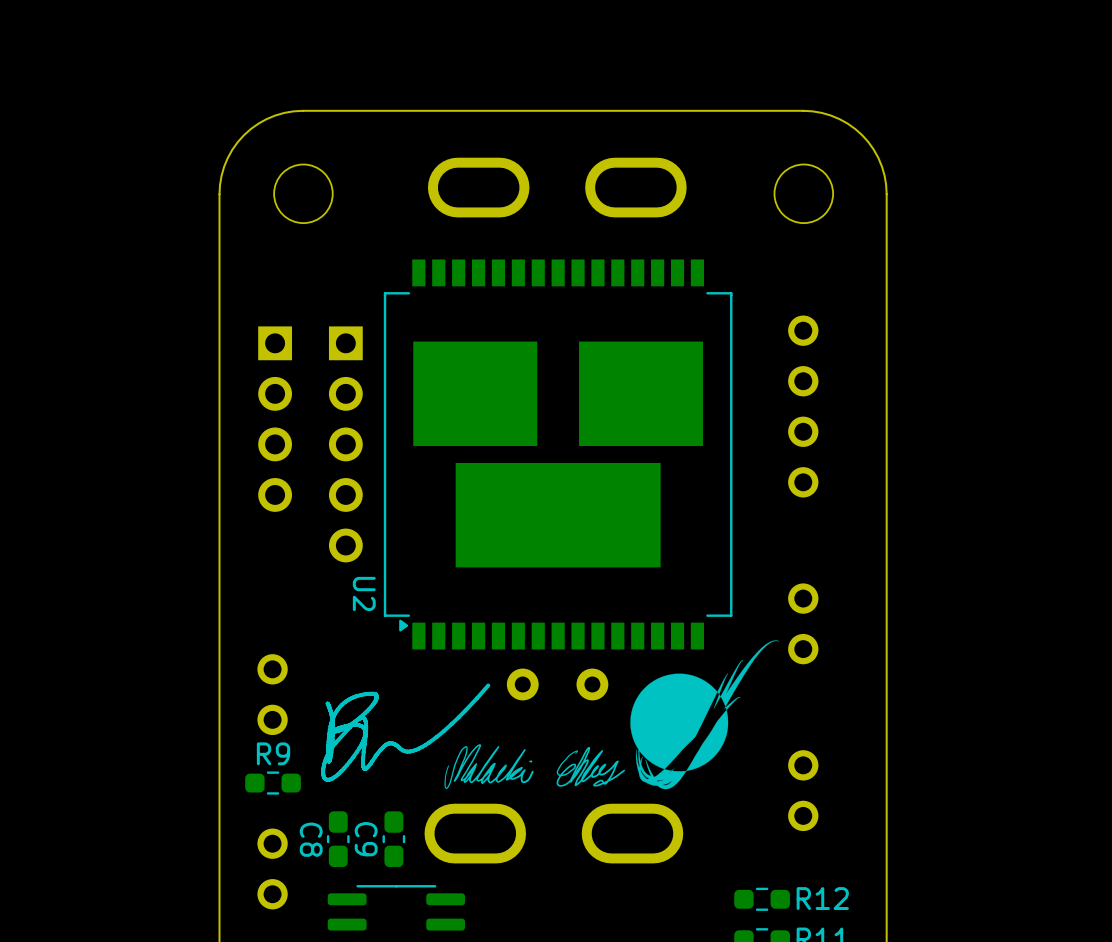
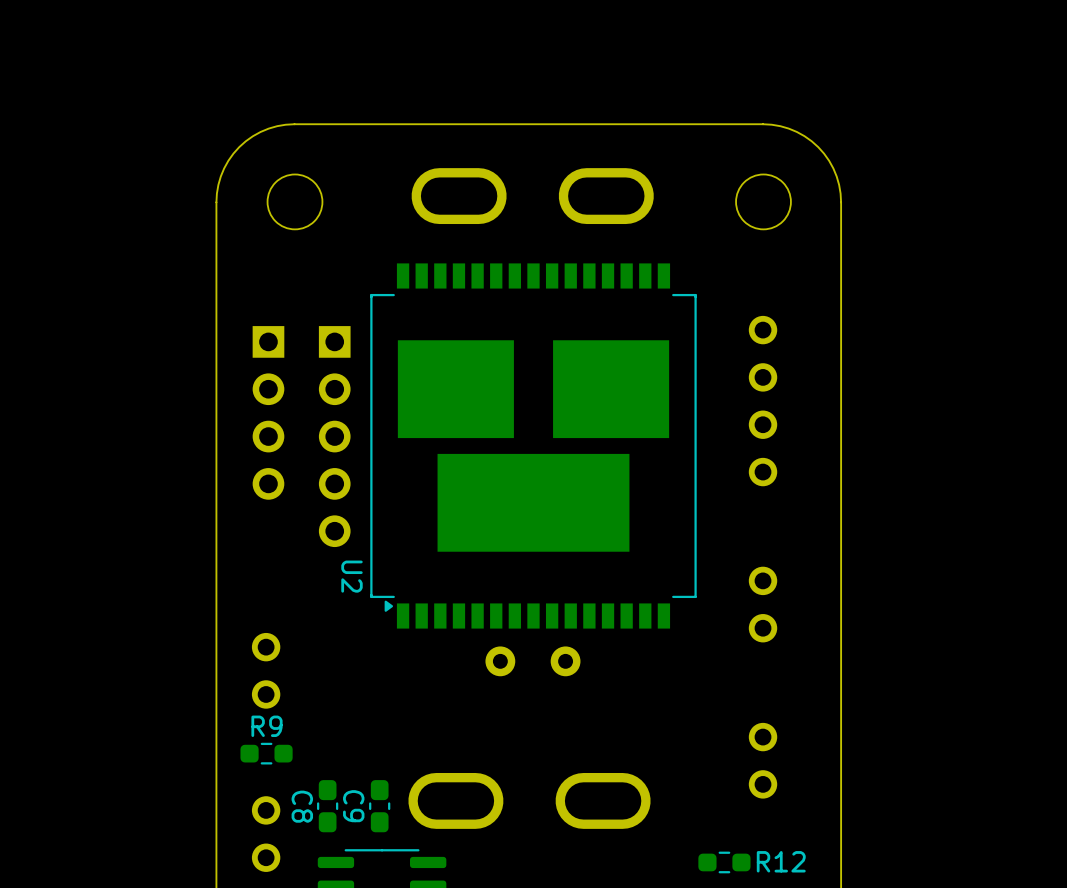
drawing: [321, 640, 780, 790] -> none

